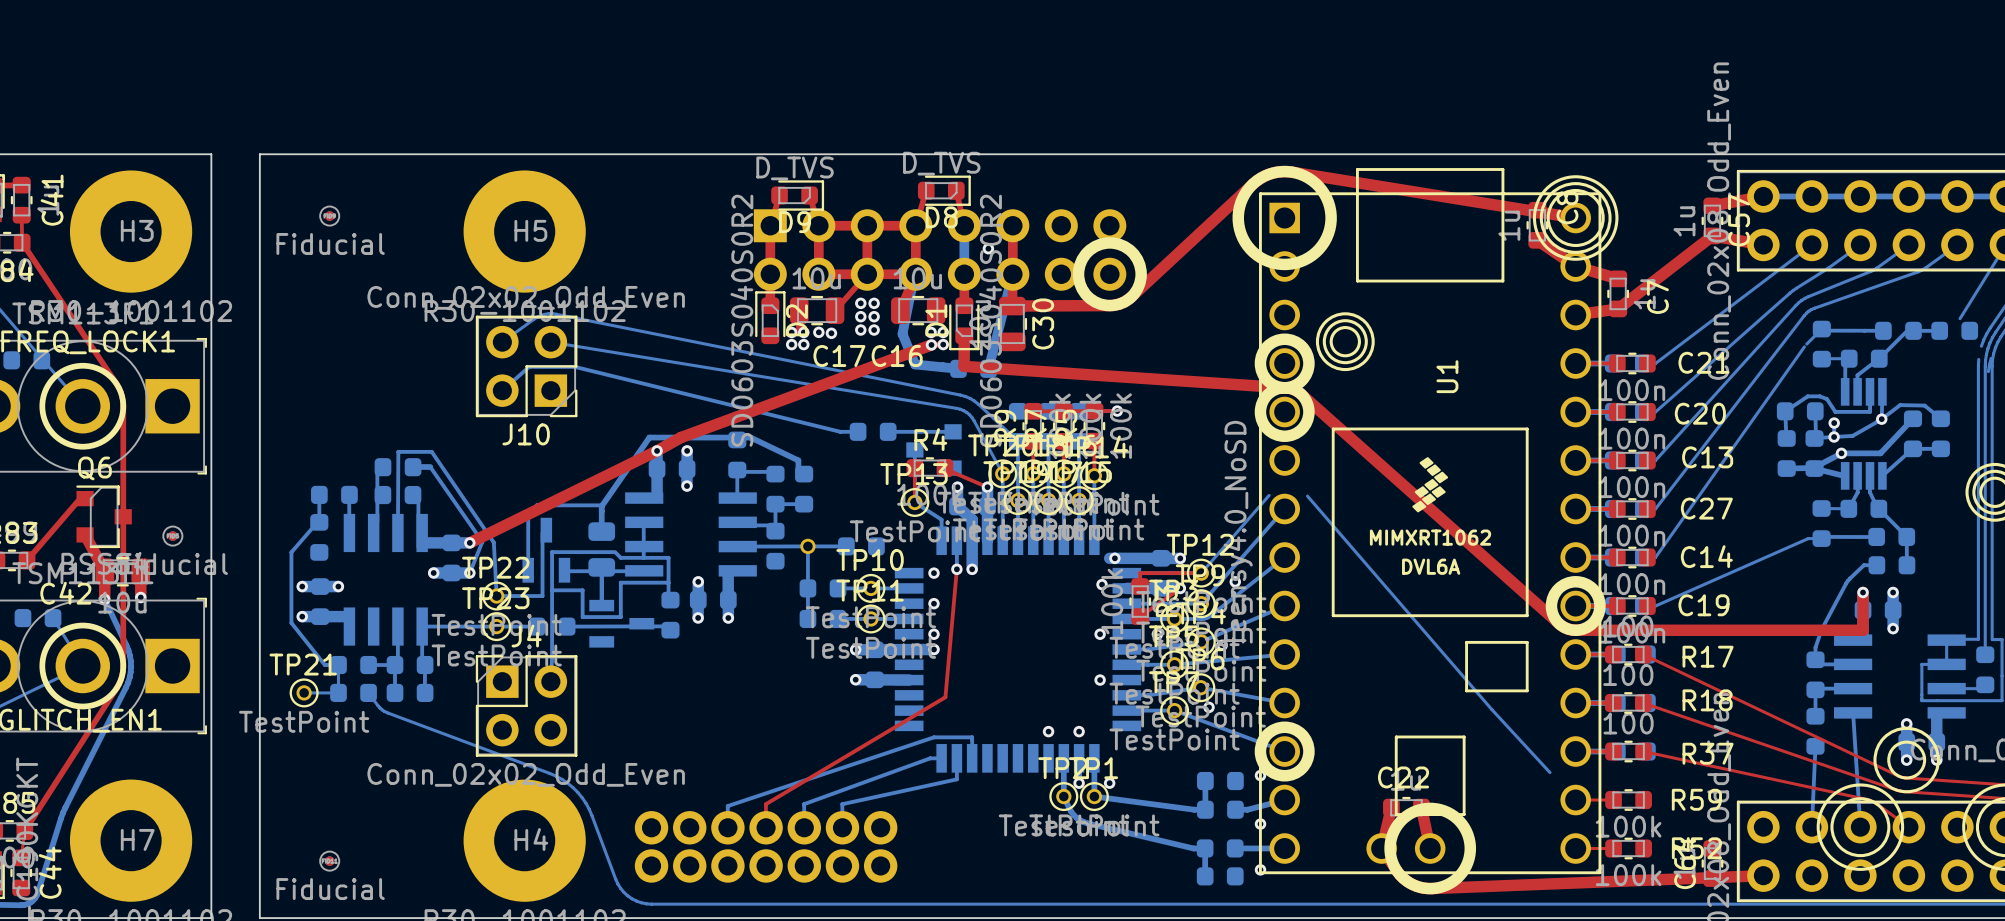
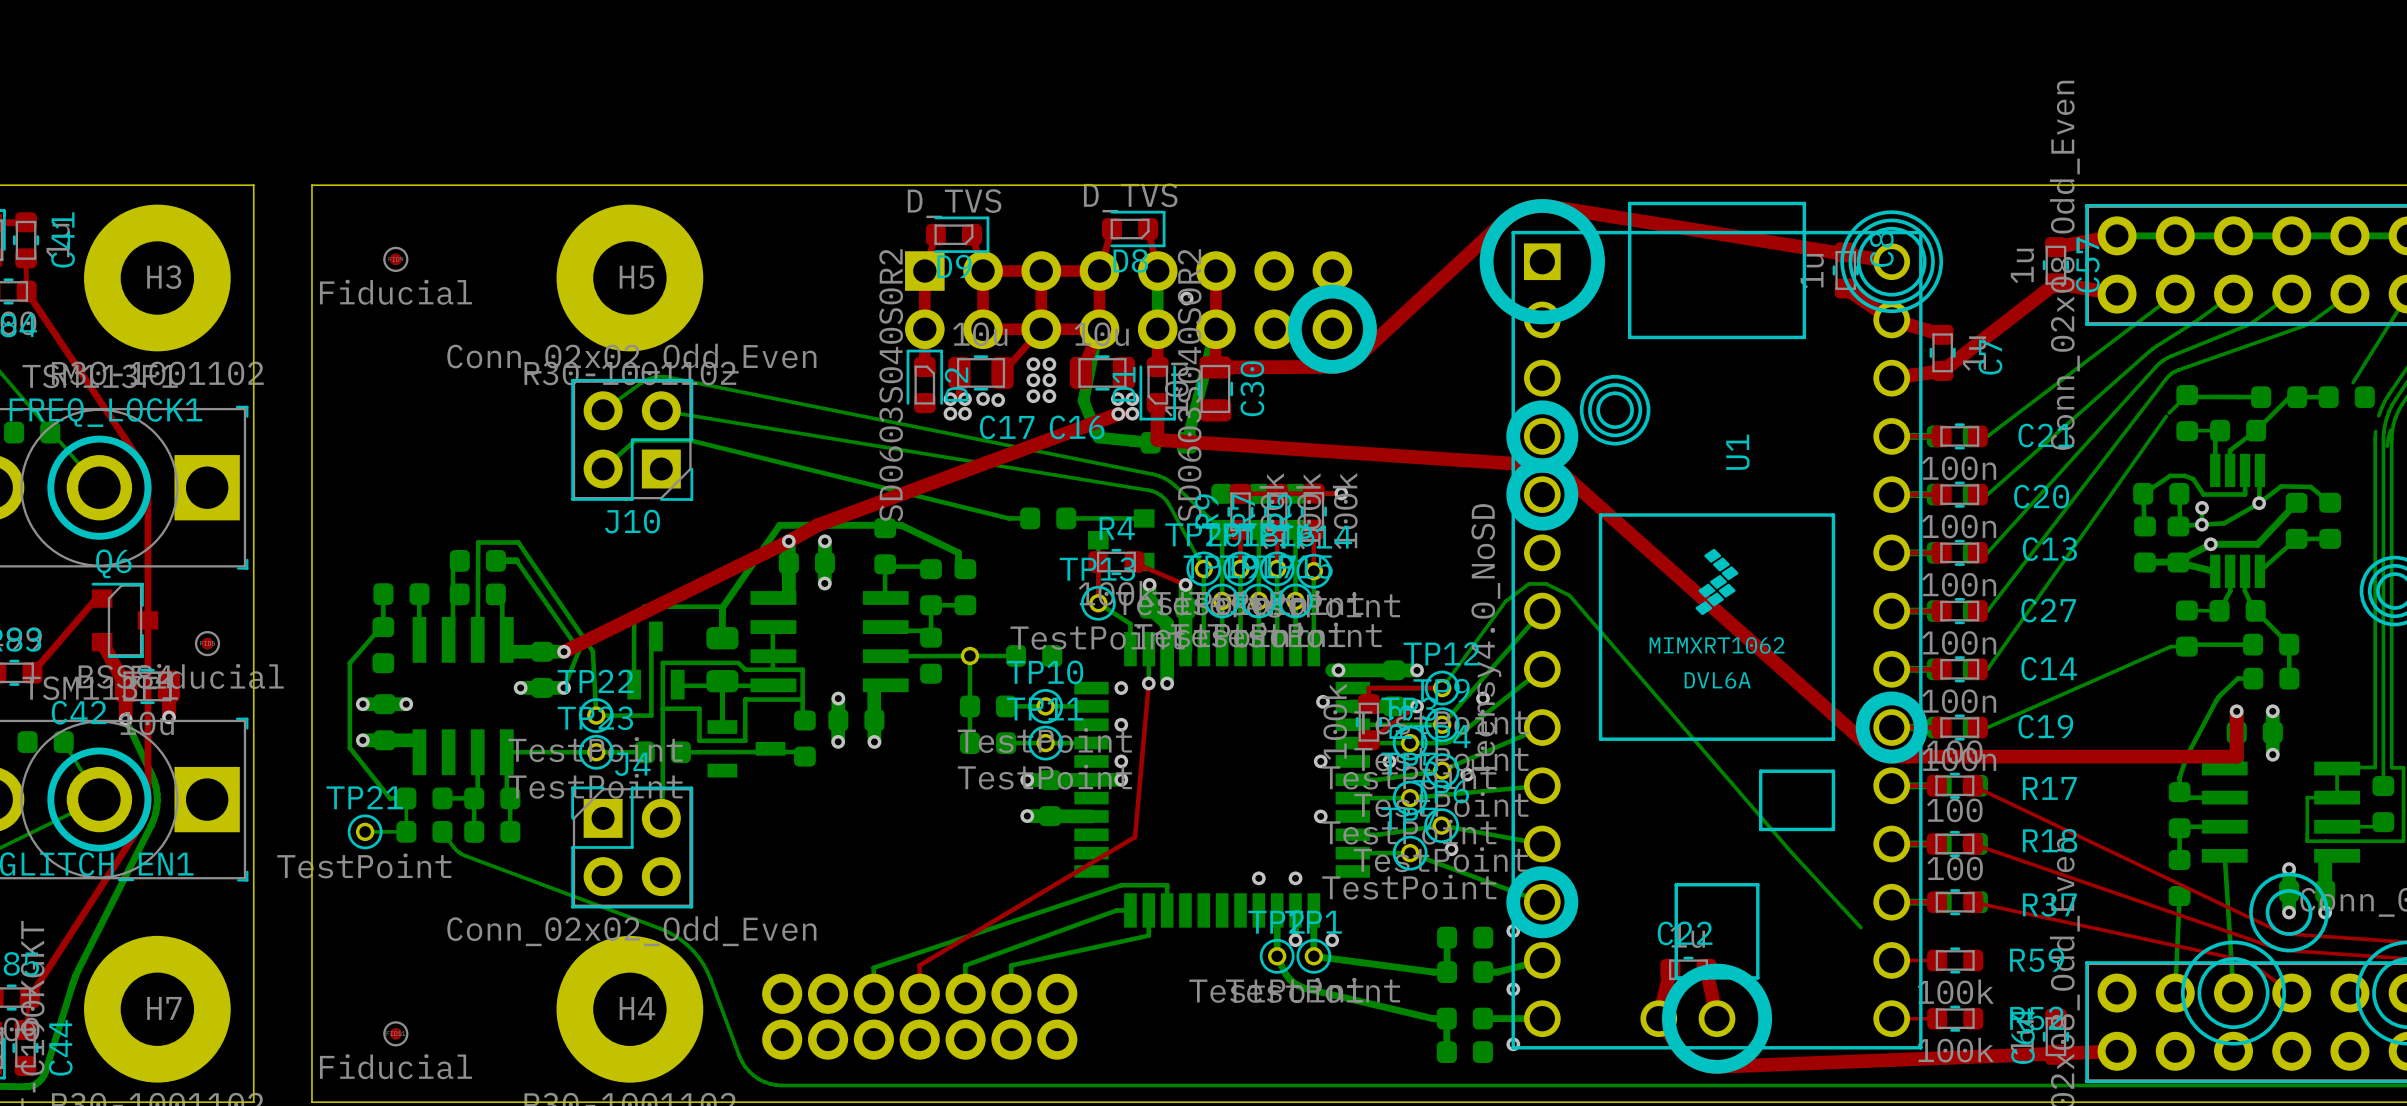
bottom track: (1269, 495) (1201, 573) -> (1569, 595) (1546, 583) (1528, 583) (1505, 601) (1442, 688)

